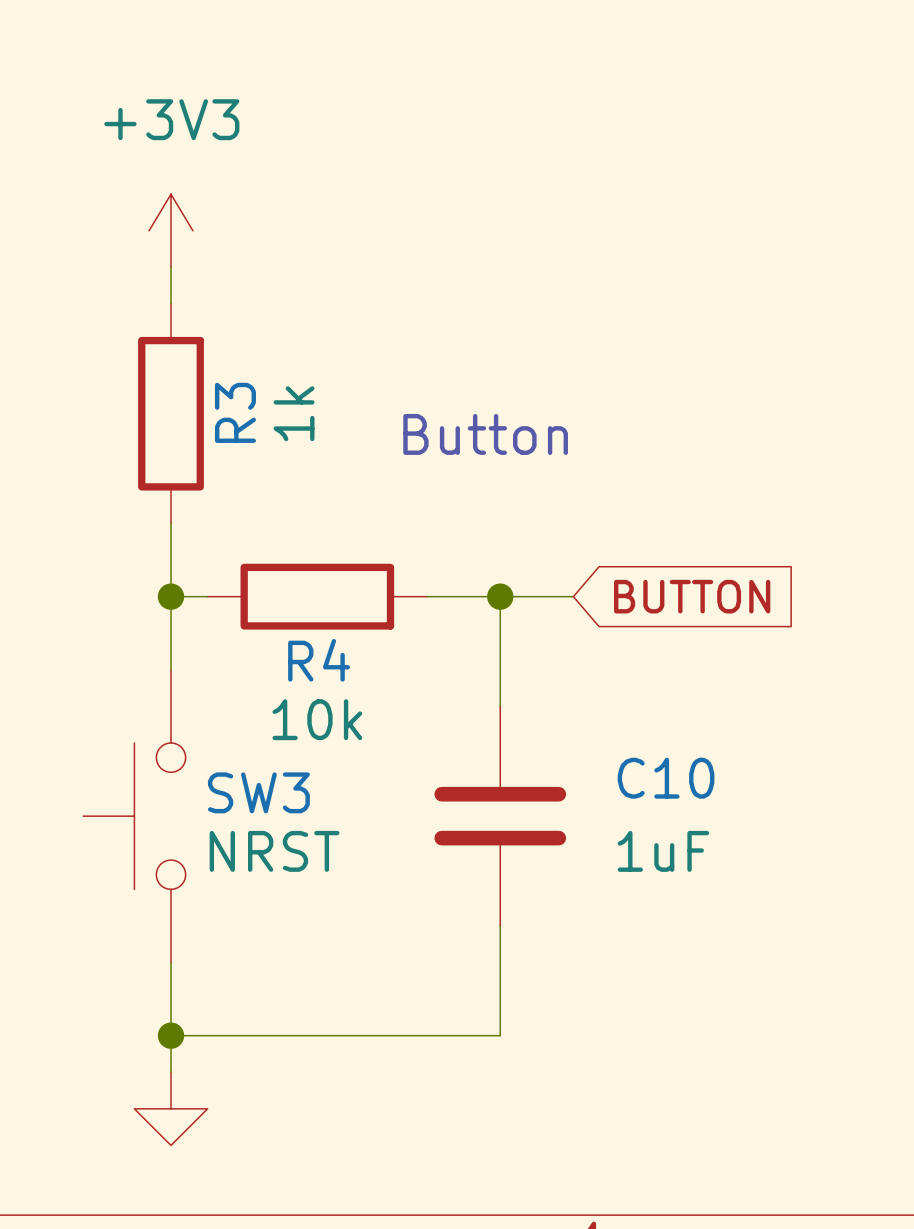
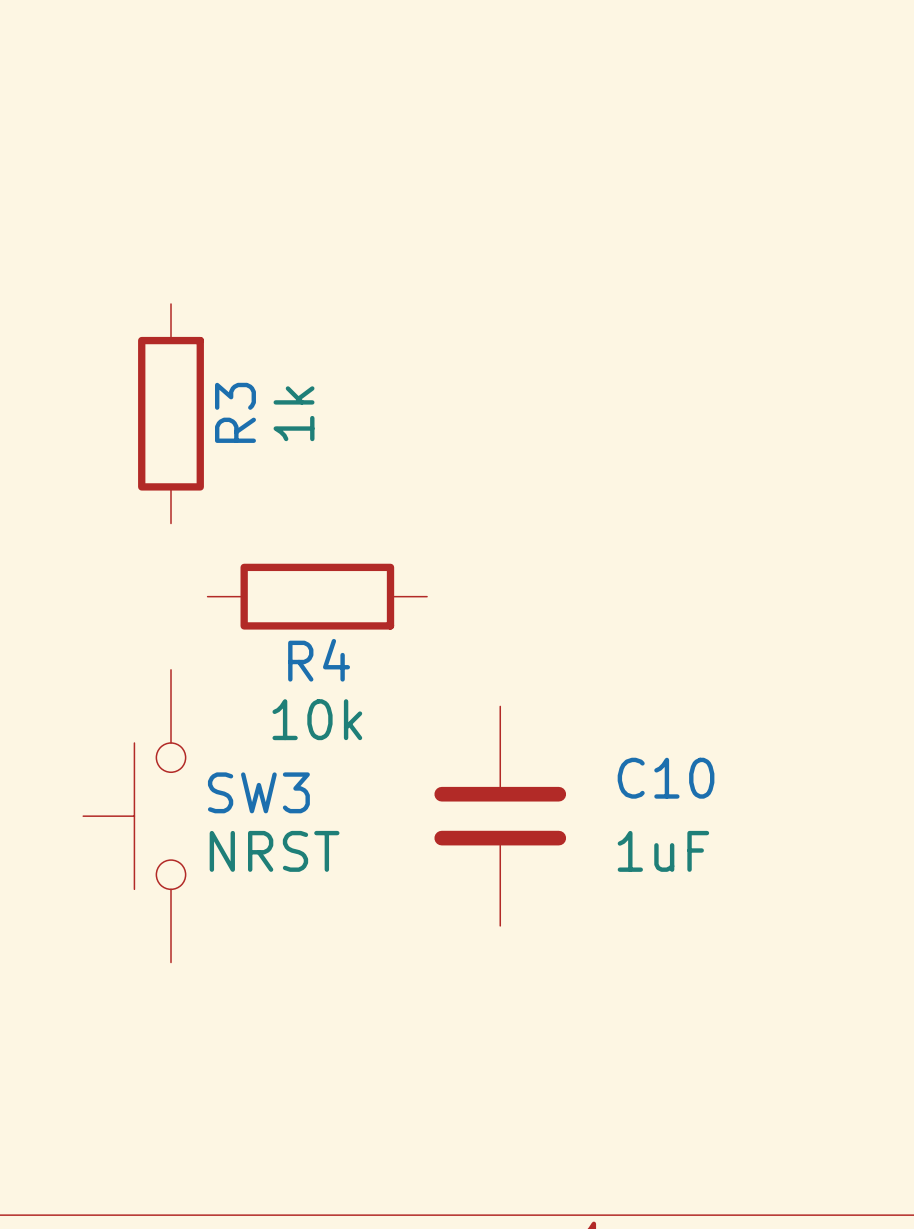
power symbol: +3V3 (171, 230) -> none
wire: (171, 267) (171, 303) -> none
text: Button (485, 434) -> none
wire: (171, 523) (171, 669) -> none
wire: (171, 596) (207, 596) -> none
junction: (171, 596) -> none
wire: (427, 596) (573, 596) -> none
wire: (500, 596) (500, 706) -> none
junction: (500, 596) -> none
global label: BUTTON (692, 596) -> none
wire: (500, 925) (500, 1035) (171, 1035) -> none
wire: (171, 962) (171, 1072) -> none
junction: (171, 1035) -> none
power symbol: (171, 1108) -> none

